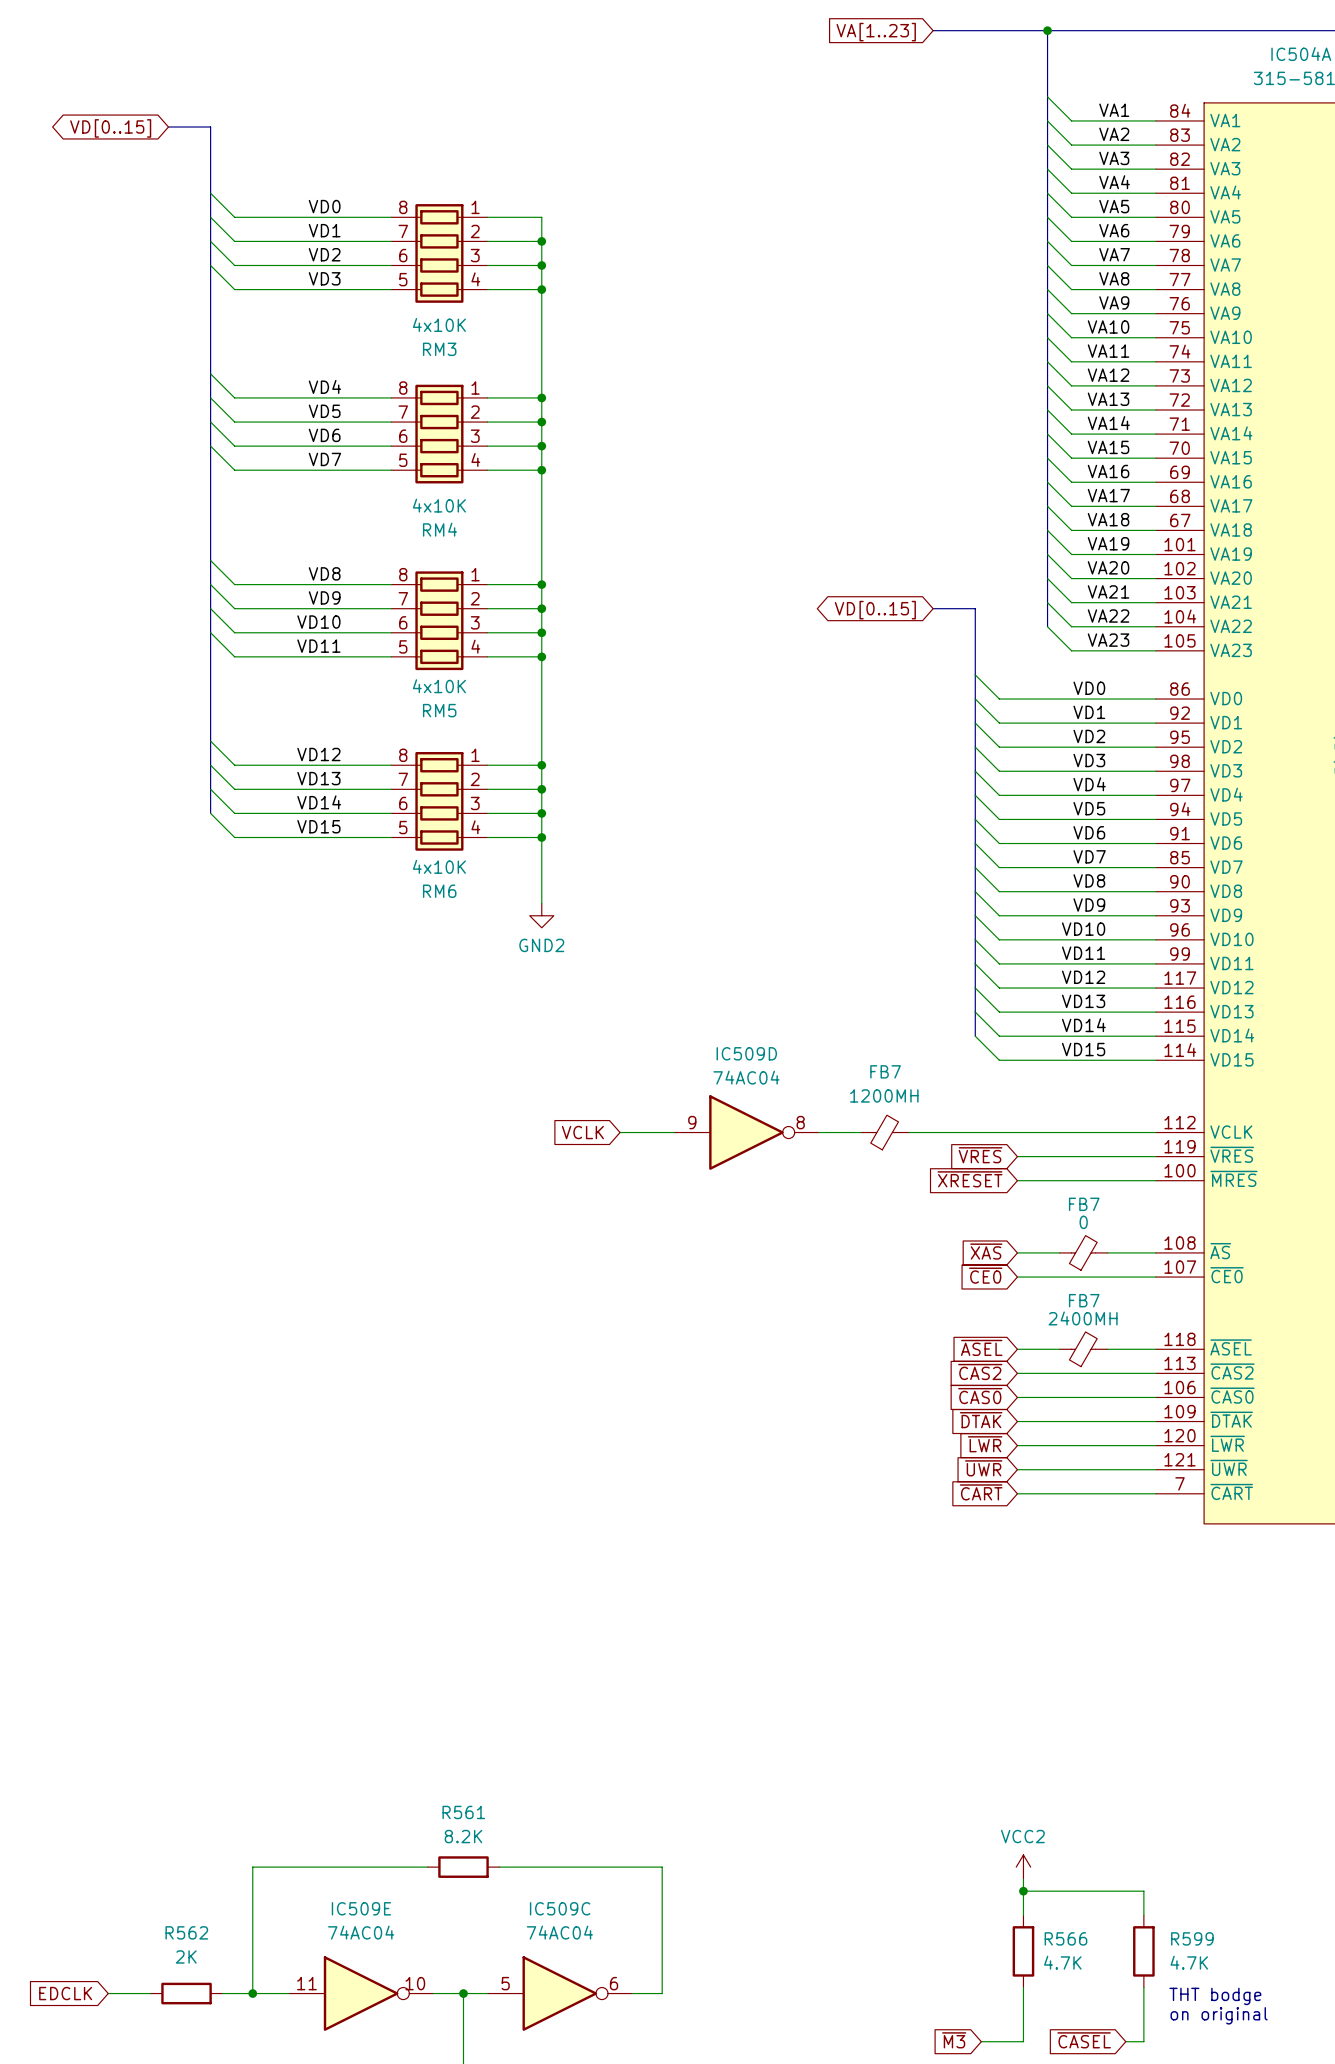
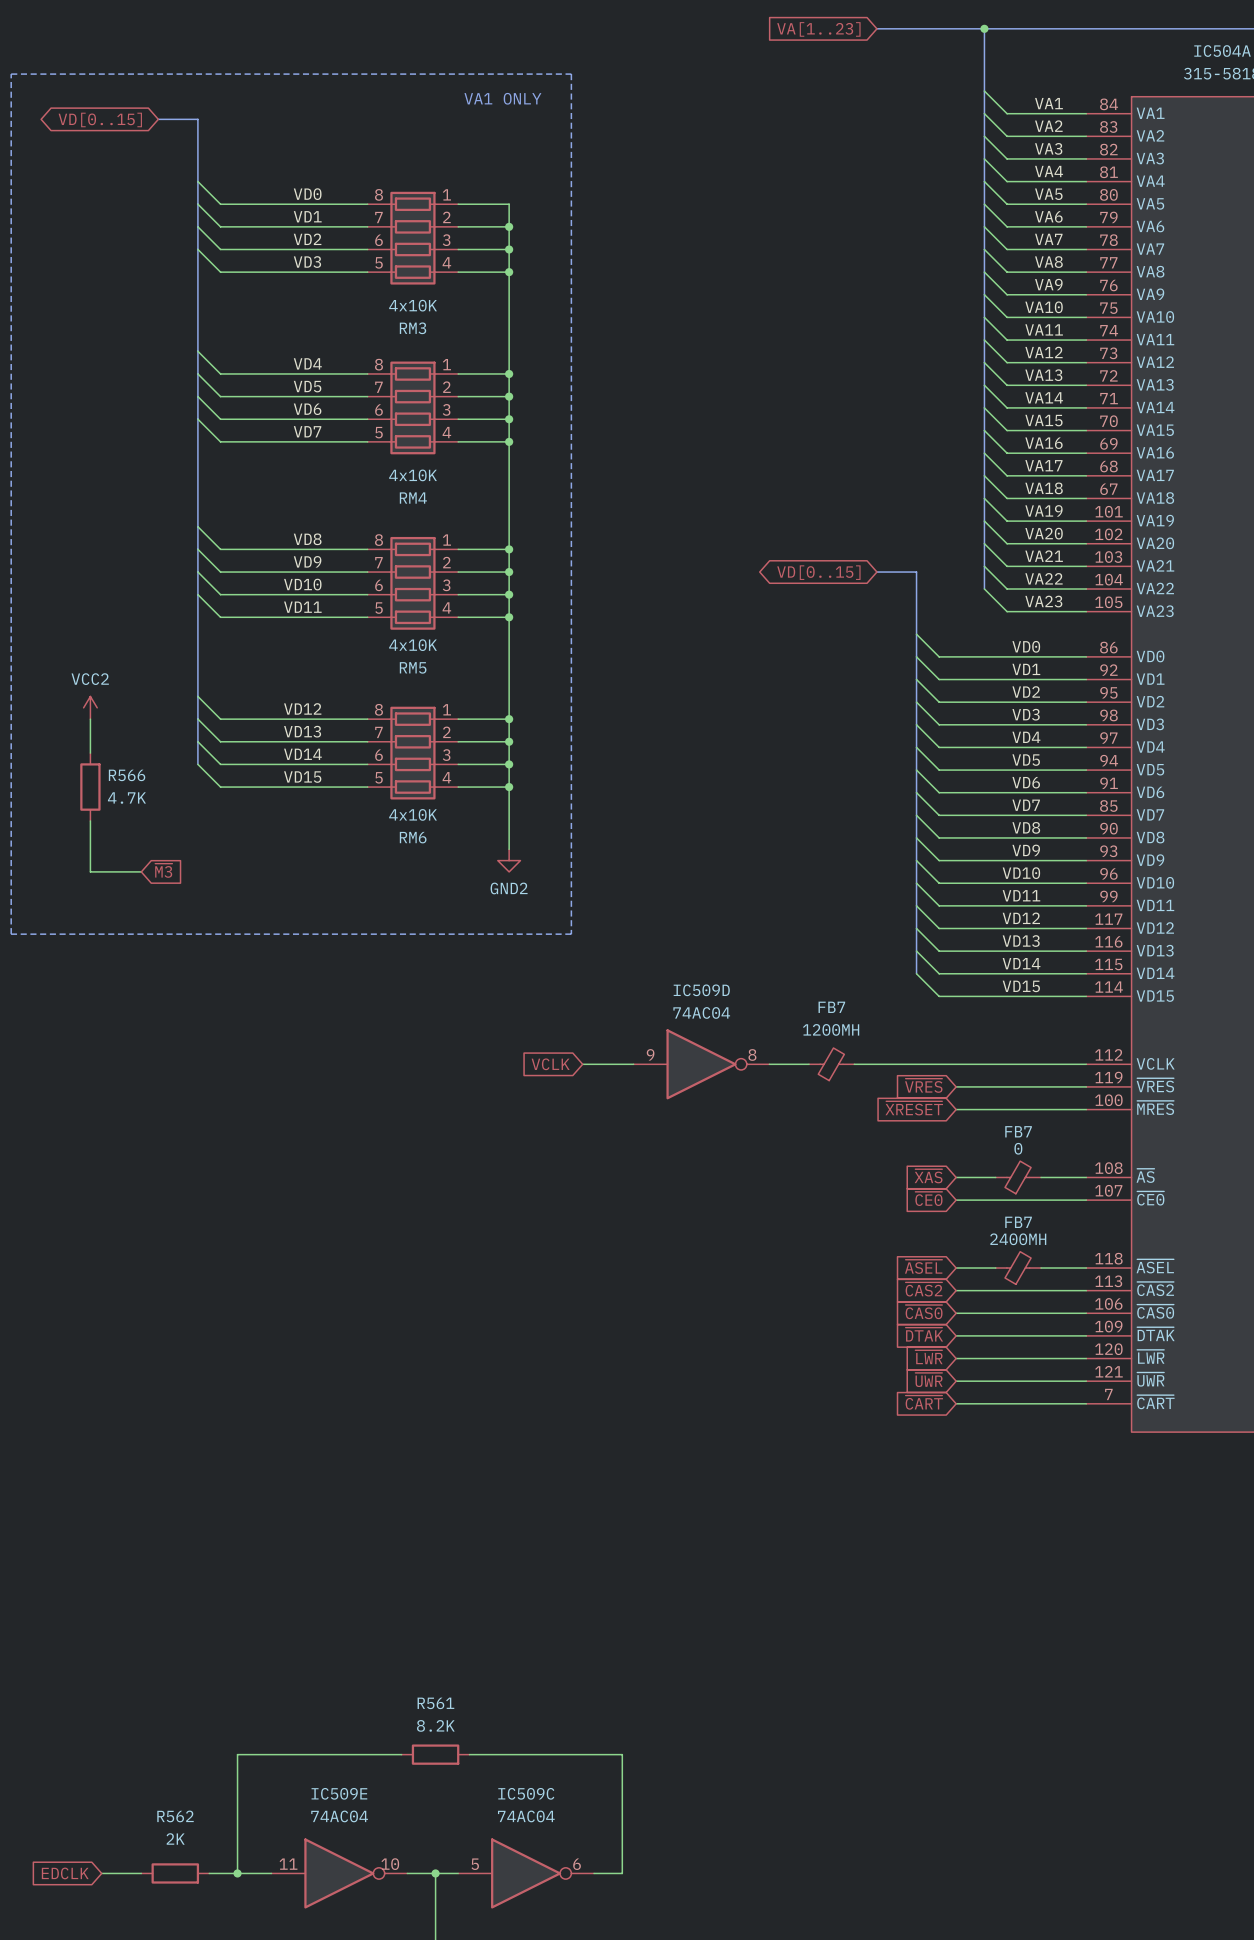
line: none -> (11, 74) (571, 74) (571, 934) (11, 934) (11, 74)
text: none -> VA1 ONLY (502, 98)
power symbol: none -> VCC2 (90, 707)
wire: none -> (90, 719) (90, 753)
wire: none -> (90, 820) (90, 871) (141, 871)
global label: none -> ~{M3} (163, 870)
power symbol: VCC2 (1023, 1867) -> none
wire: (1023, 1879) (1023, 1915) -> none
wire: (1023, 1891) (1143, 1891) (1143, 1915) -> none
junction: (1023, 1891) -> none
R566 position: (1023, 1951) -> (90, 787)
R599: 4.7K (1143, 1951) -> none
wire: (1023, 1987) (1023, 2041) (981, 2041) -> none
wire: (1143, 1987) (1143, 2041) (1125, 2041) -> none
text: THT bodge (1215, 1996) -> none
text: on original (1219, 2015) -> none
global label: ~{M3} (954, 2040) -> none
global label: ~{CASEL} (1084, 2040) -> none

